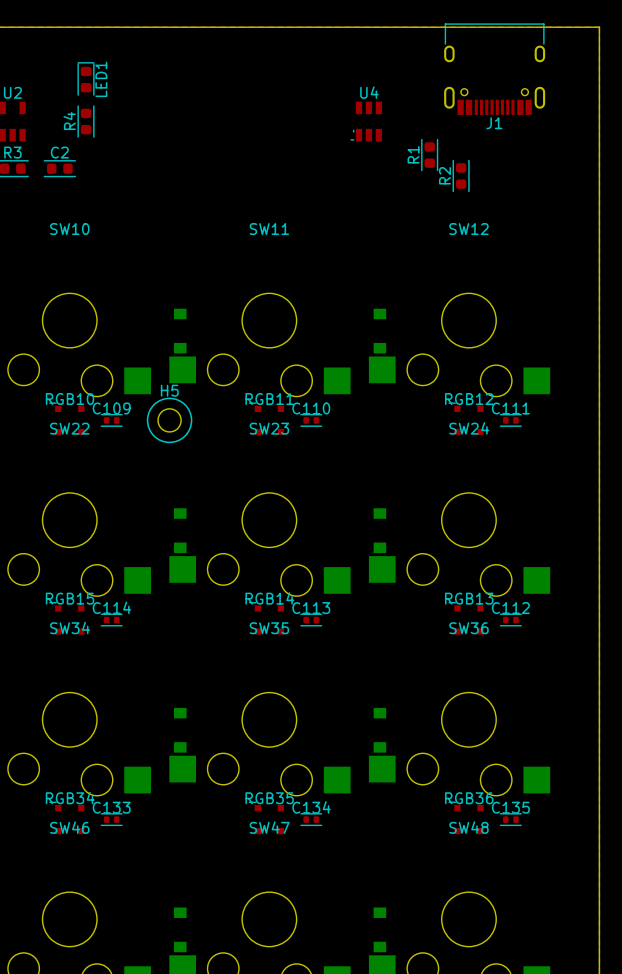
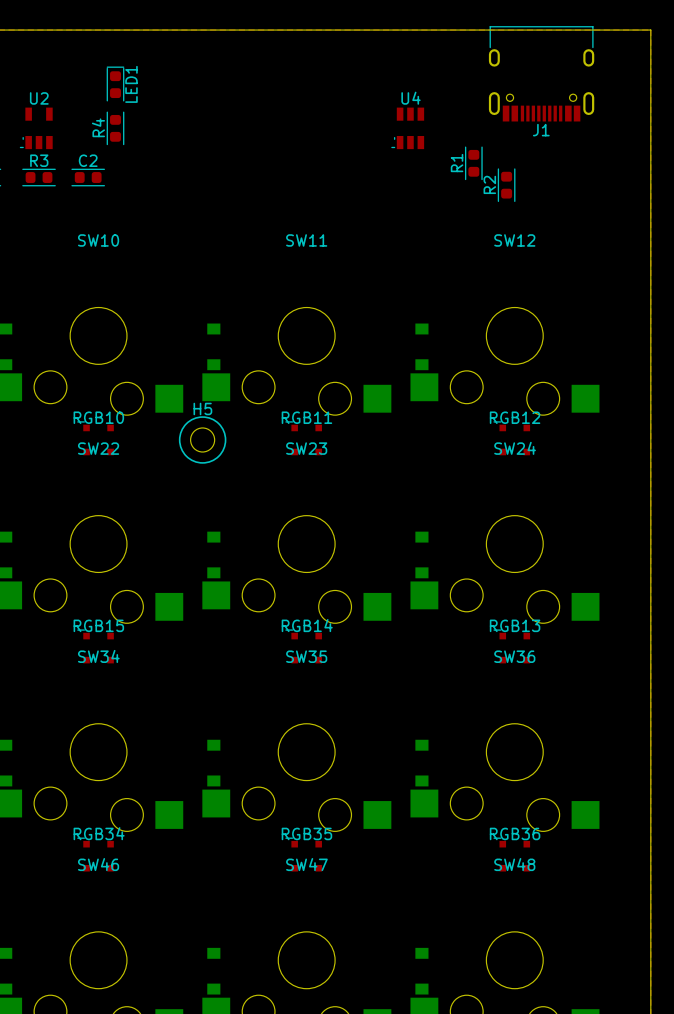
C109: (111, 420) -> none
C110: (311, 420) -> none
C111: (510, 420) -> none
C114: (111, 619) -> none
C113: (311, 619) -> none
C112: (510, 619) -> none
C133: (111, 819) -> none
C134: (311, 819) -> none
C135: (510, 819) -> none

